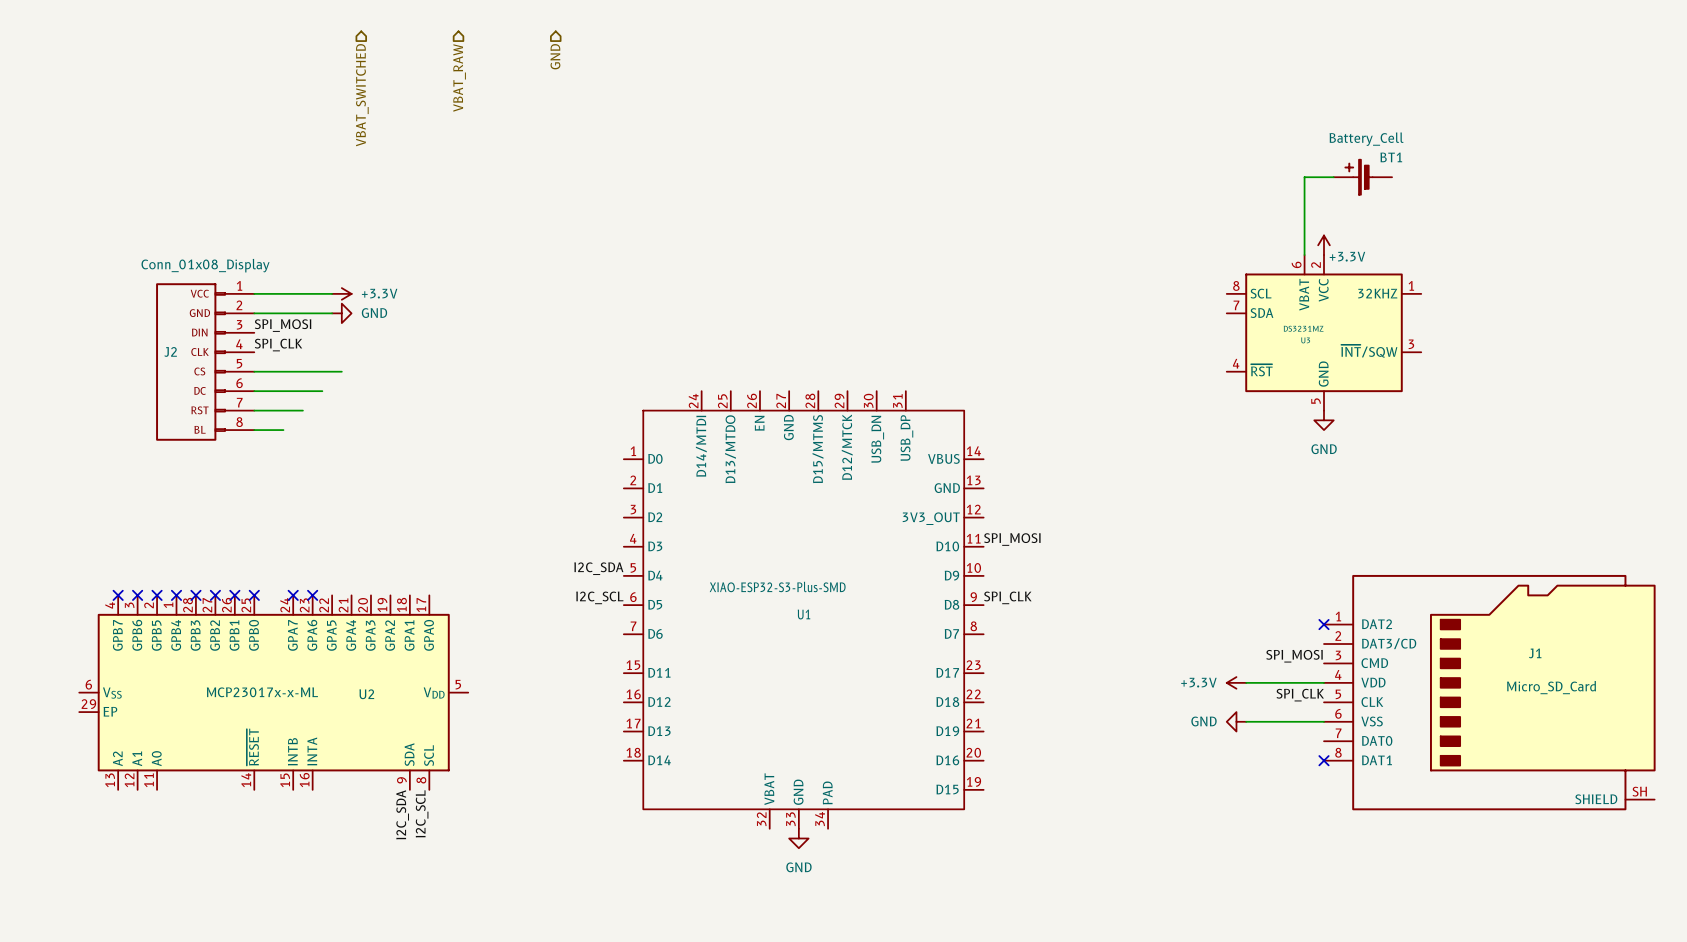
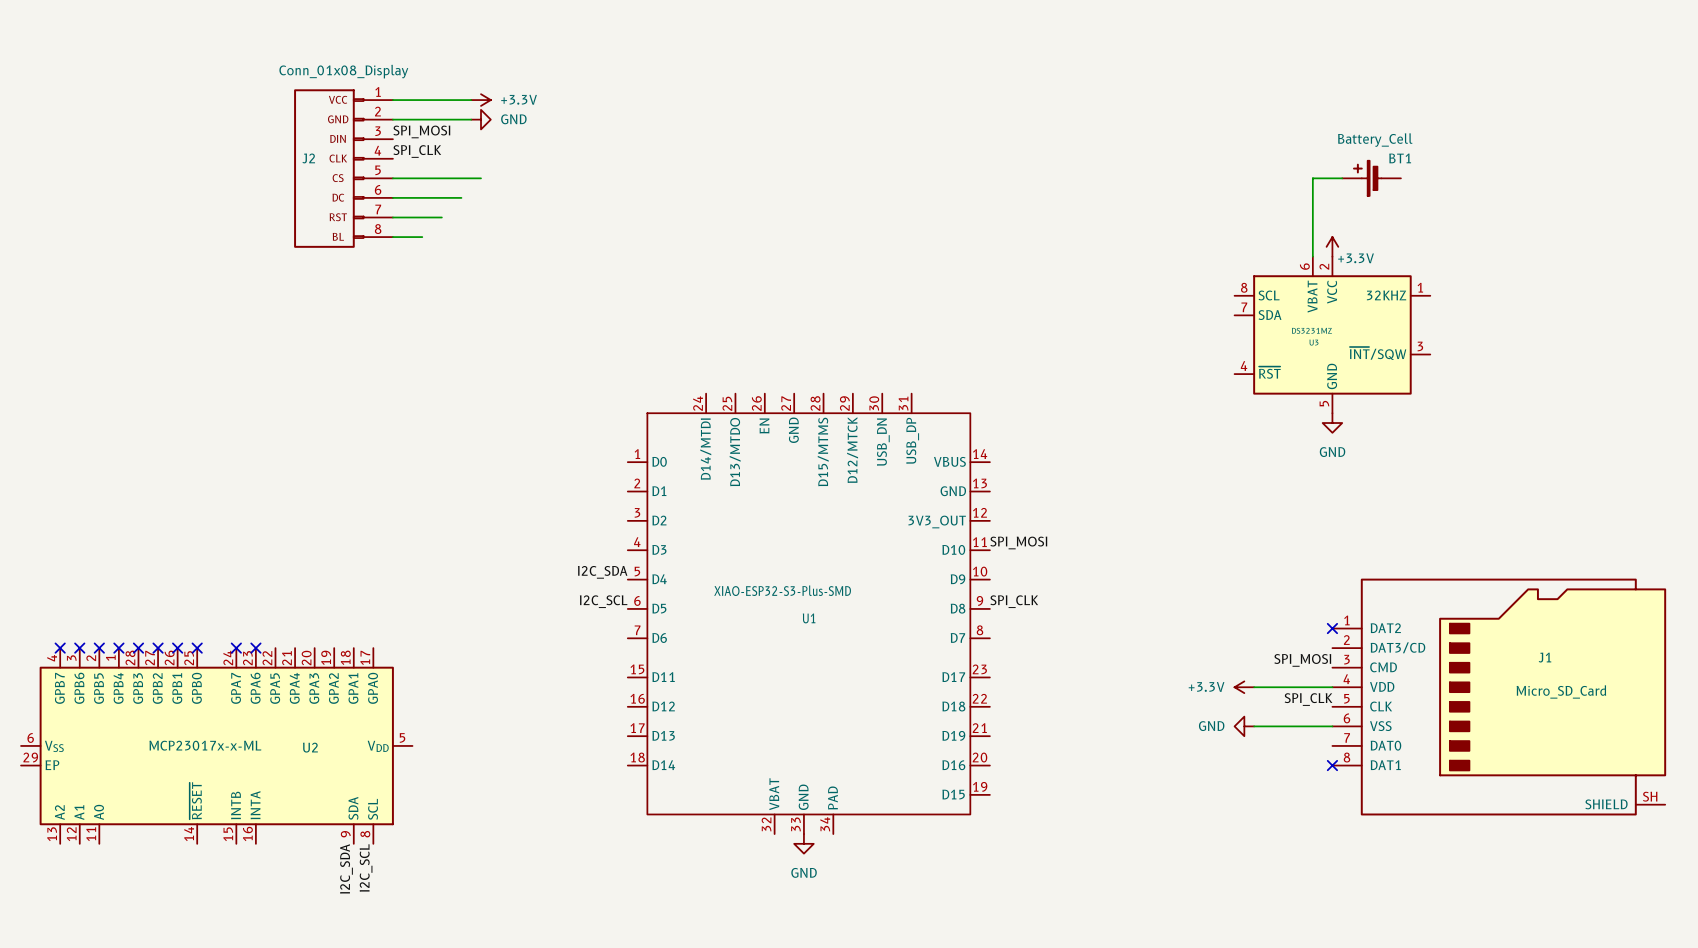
hierarchical label: GND (555, 56) -> none
hierarchical label: VBAT_RAW (459, 77) -> none
hierarchical label: VBAT_SWITCHED (362, 95) -> none
wire: none -> (392, 100) (471, 100)
power symbol: none -> +3.3V (481, 100)
wire: none -> (392, 119) (471, 119)
power symbol: none -> GND (481, 119)
label: none -> SPI_MOSI (421, 131)
label: none -> SPI_CLK (417, 151)
wire: none -> (392, 178) (481, 178)
wire: none -> (392, 197) (461, 197)
wire: none -> (392, 217) (441, 217)
wire: none -> (392, 237) (422, 237)
wire: (254, 293) (332, 293) -> none
power symbol: +3.3V (341, 293) -> none
wire: (254, 313) (332, 313) -> none
power symbol: GND (341, 313) -> none
label: SPI_MOSI (283, 325) -> none
label: SPI_CLK (278, 345) -> none
J2 position: (205, 361) -> (343, 168)
wire: (254, 371) (341, 371) -> none
wire: (254, 391) (322, 391) -> none
wire: (254, 410) (302, 410) -> none
wire: (254, 430) (283, 430) -> none
no-connect mark: (118, 595) -> none
no-connect mark: (137, 595) -> none
no-connect mark: (157, 595) -> none
no-connect mark: (176, 595) -> none
no-connect mark: (195, 595) -> none
no-connect mark: (215, 595) -> none
no-connect mark: (234, 595) -> none
no-connect mark: (254, 595) -> none
no-connect mark: (293, 595) -> none
no-connect mark: (312, 595) -> none
no-connect mark: none -> (60, 648)
no-connect mark: none -> (79, 648)
no-connect mark: none -> (99, 648)
no-connect mark: none -> (118, 648)
no-connect mark: none -> (138, 648)
no-connect mark: none -> (158, 648)
no-connect mark: none -> (177, 648)
no-connect mark: none -> (197, 648)
no-connect mark: none -> (236, 648)
no-connect mark: none -> (255, 648)
U2 position: (273, 692) -> (216, 745)
label position: I2C_SCL (422, 813) -> I2C_SCL (366, 867)
label position: I2C_SDA (402, 814) -> I2C_SDA (346, 868)

